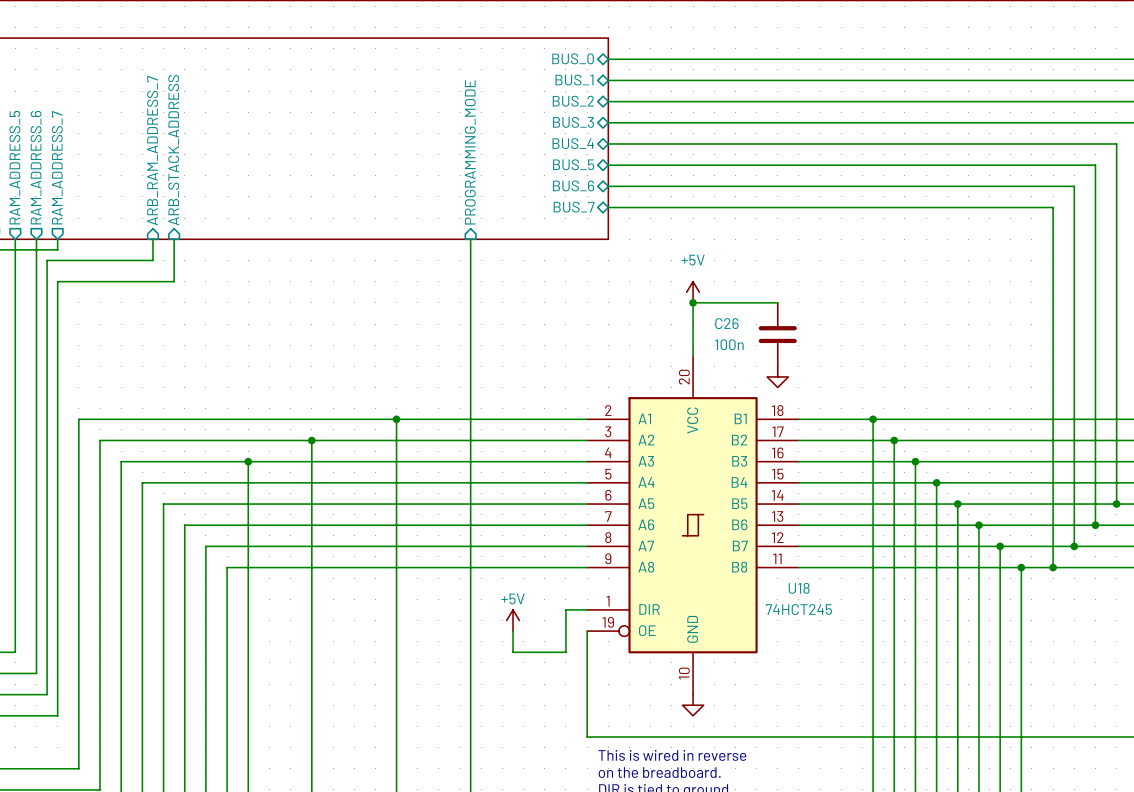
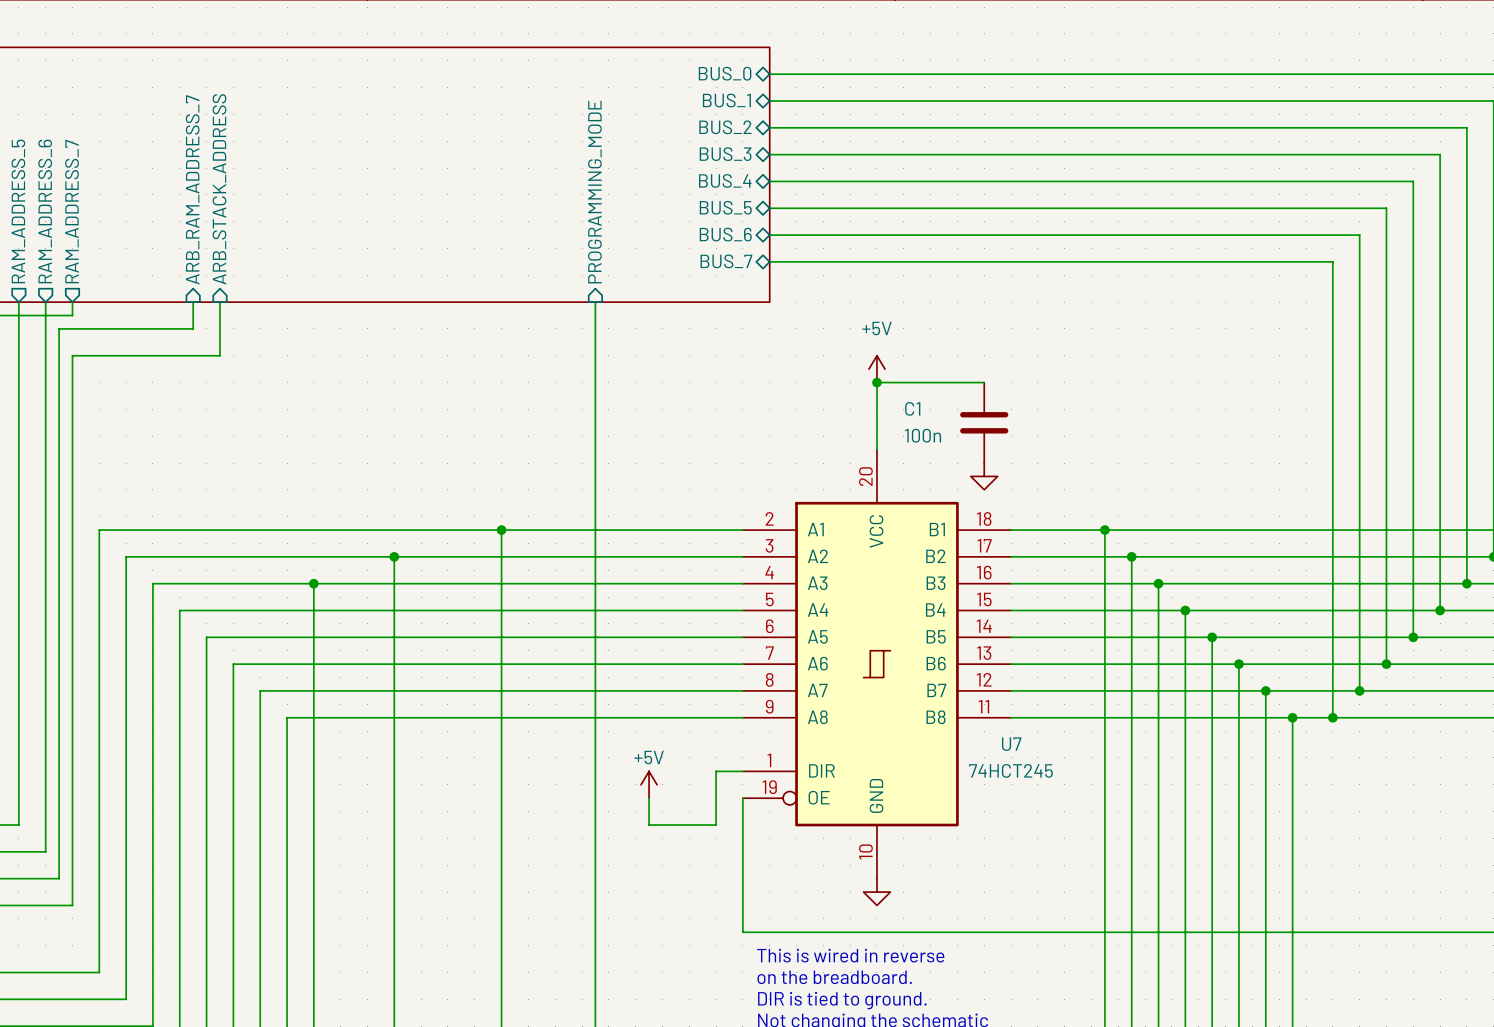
C26 name: C26 (726, 323) -> C1 (912, 408)
U18 name: U18 (799, 588) -> U7 (1011, 744)

